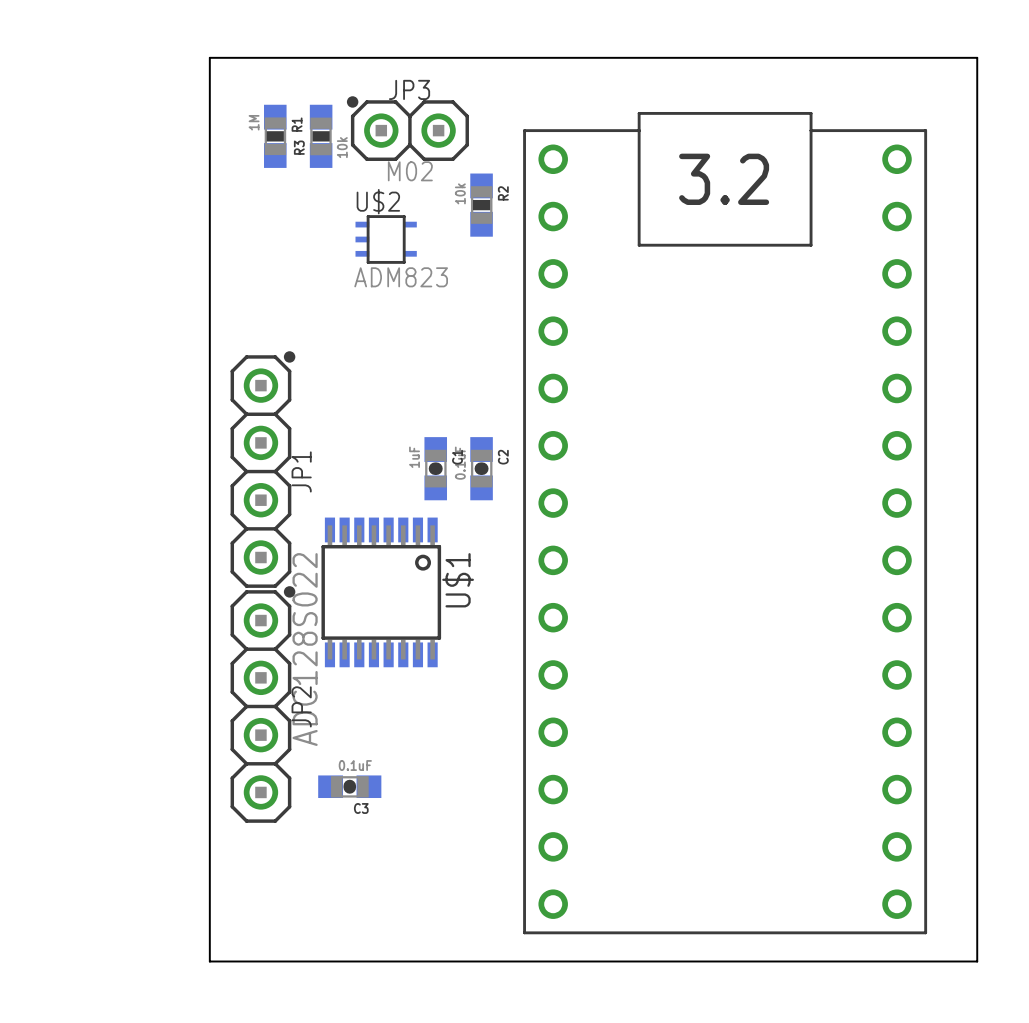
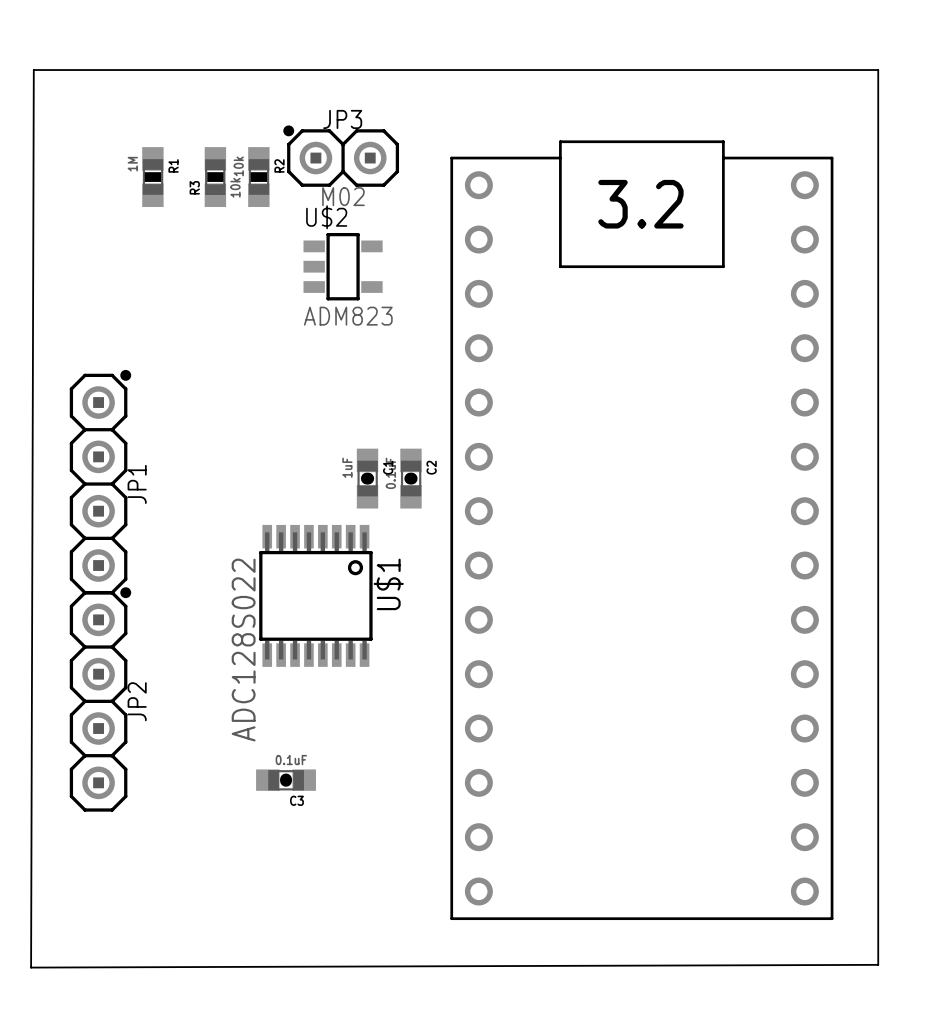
board edge: (977, 57) (209, 57) (209, 961) (977, 961) (977, 57) -> (878, 70) (878, 964) (31, 967) (33, 70) (878, 70)
R1 position: (275, 136) -> (152, 177)
R3 position: (321, 136) -> (215, 177)
R2 position: (481, 205) -> (258, 177)
U$2 footprint: [355, 215, 417, 264] -> [303, 232, 383, 301]
JP1 position: (262, 469) -> (100, 482)
JP2 position: (262, 704) -> (100, 699)

